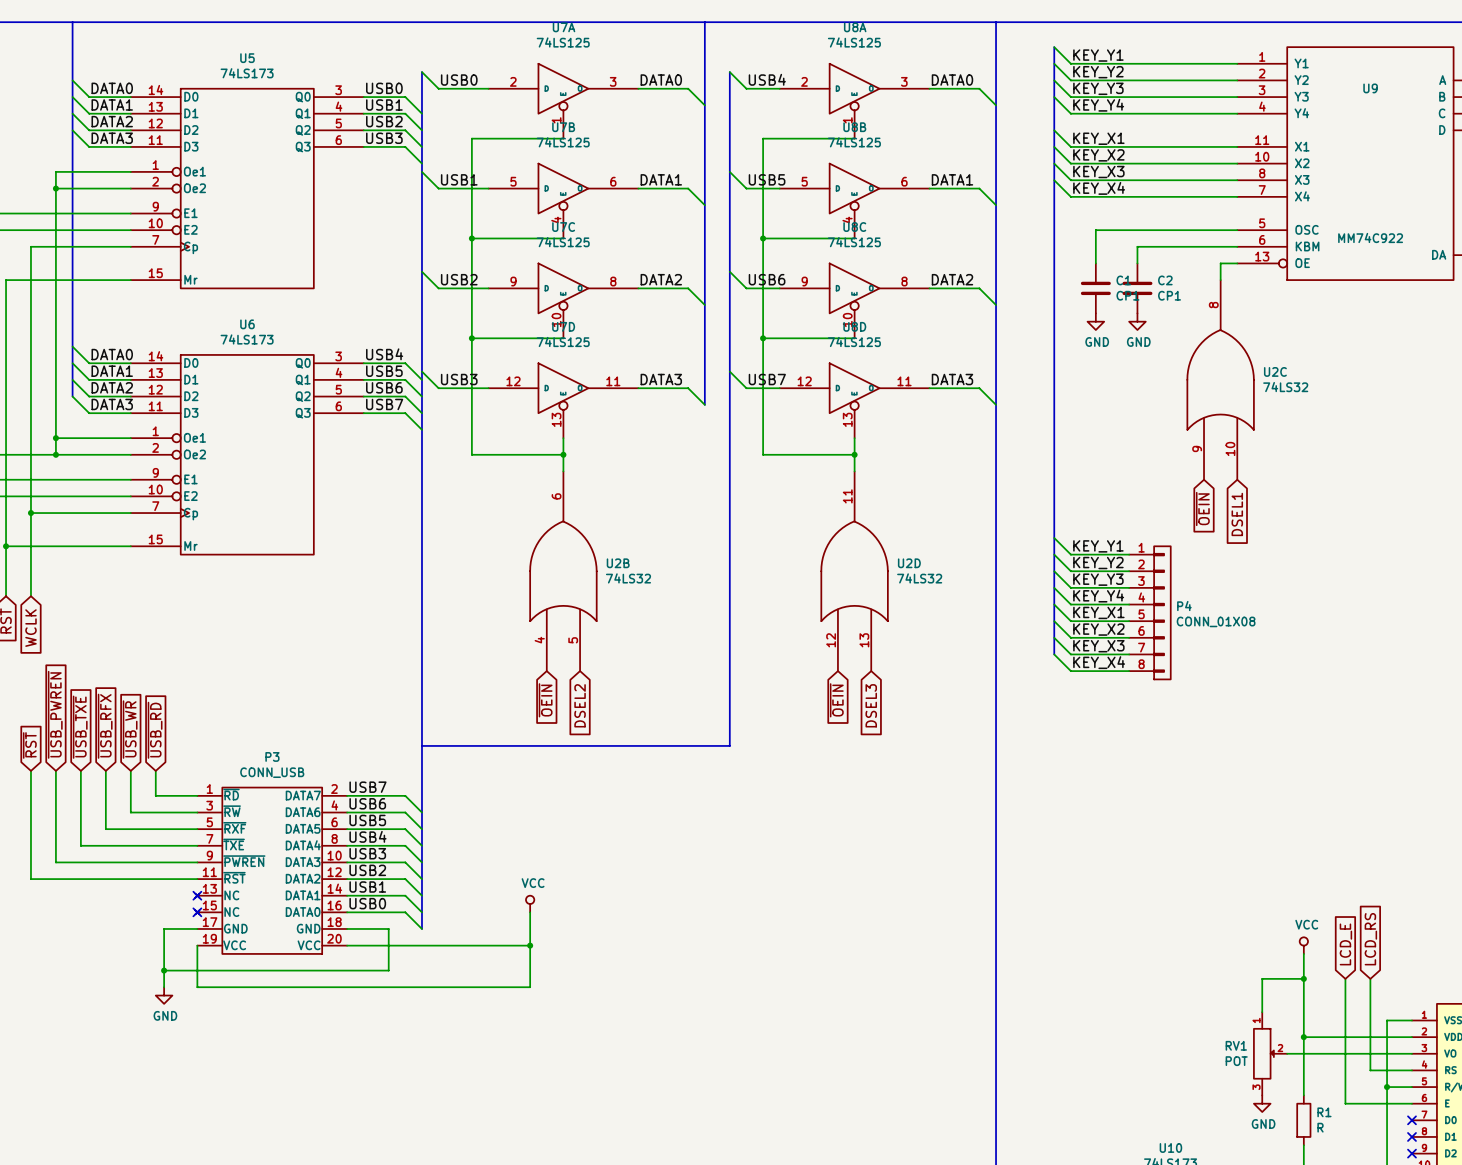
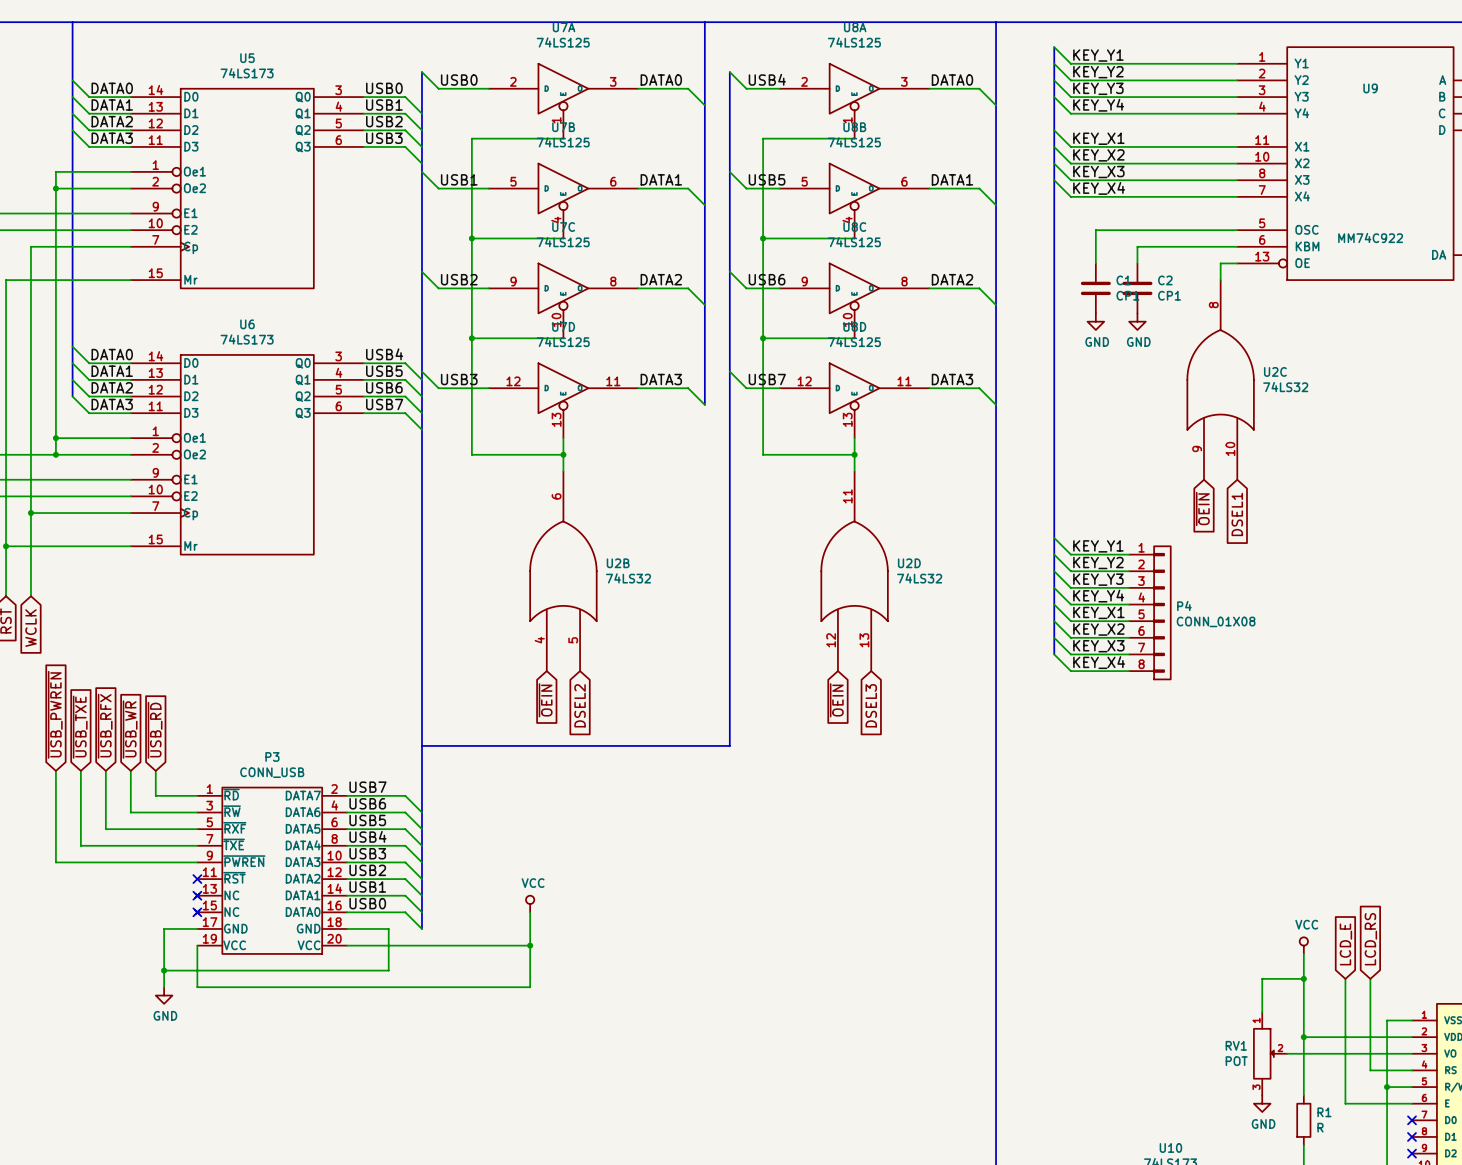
global label: ~{RST} (29, 745) -> none
wire: (30, 770) (30, 879) (197, 879) -> none
no-connect mark: none -> (197, 879)

